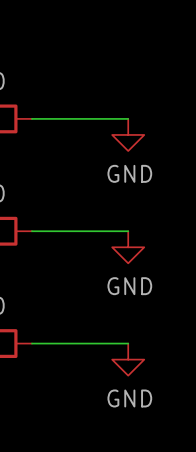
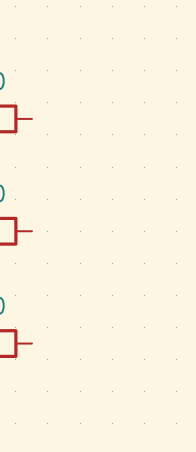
wire: (31, 118) (128, 118) -> none
power symbol: GND (128, 134) -> none
wire: (31, 231) (128, 231) -> none
power symbol: GND (128, 247) -> none
wire: (31, 343) (128, 343) -> none
power symbol: GND (128, 359) -> none

